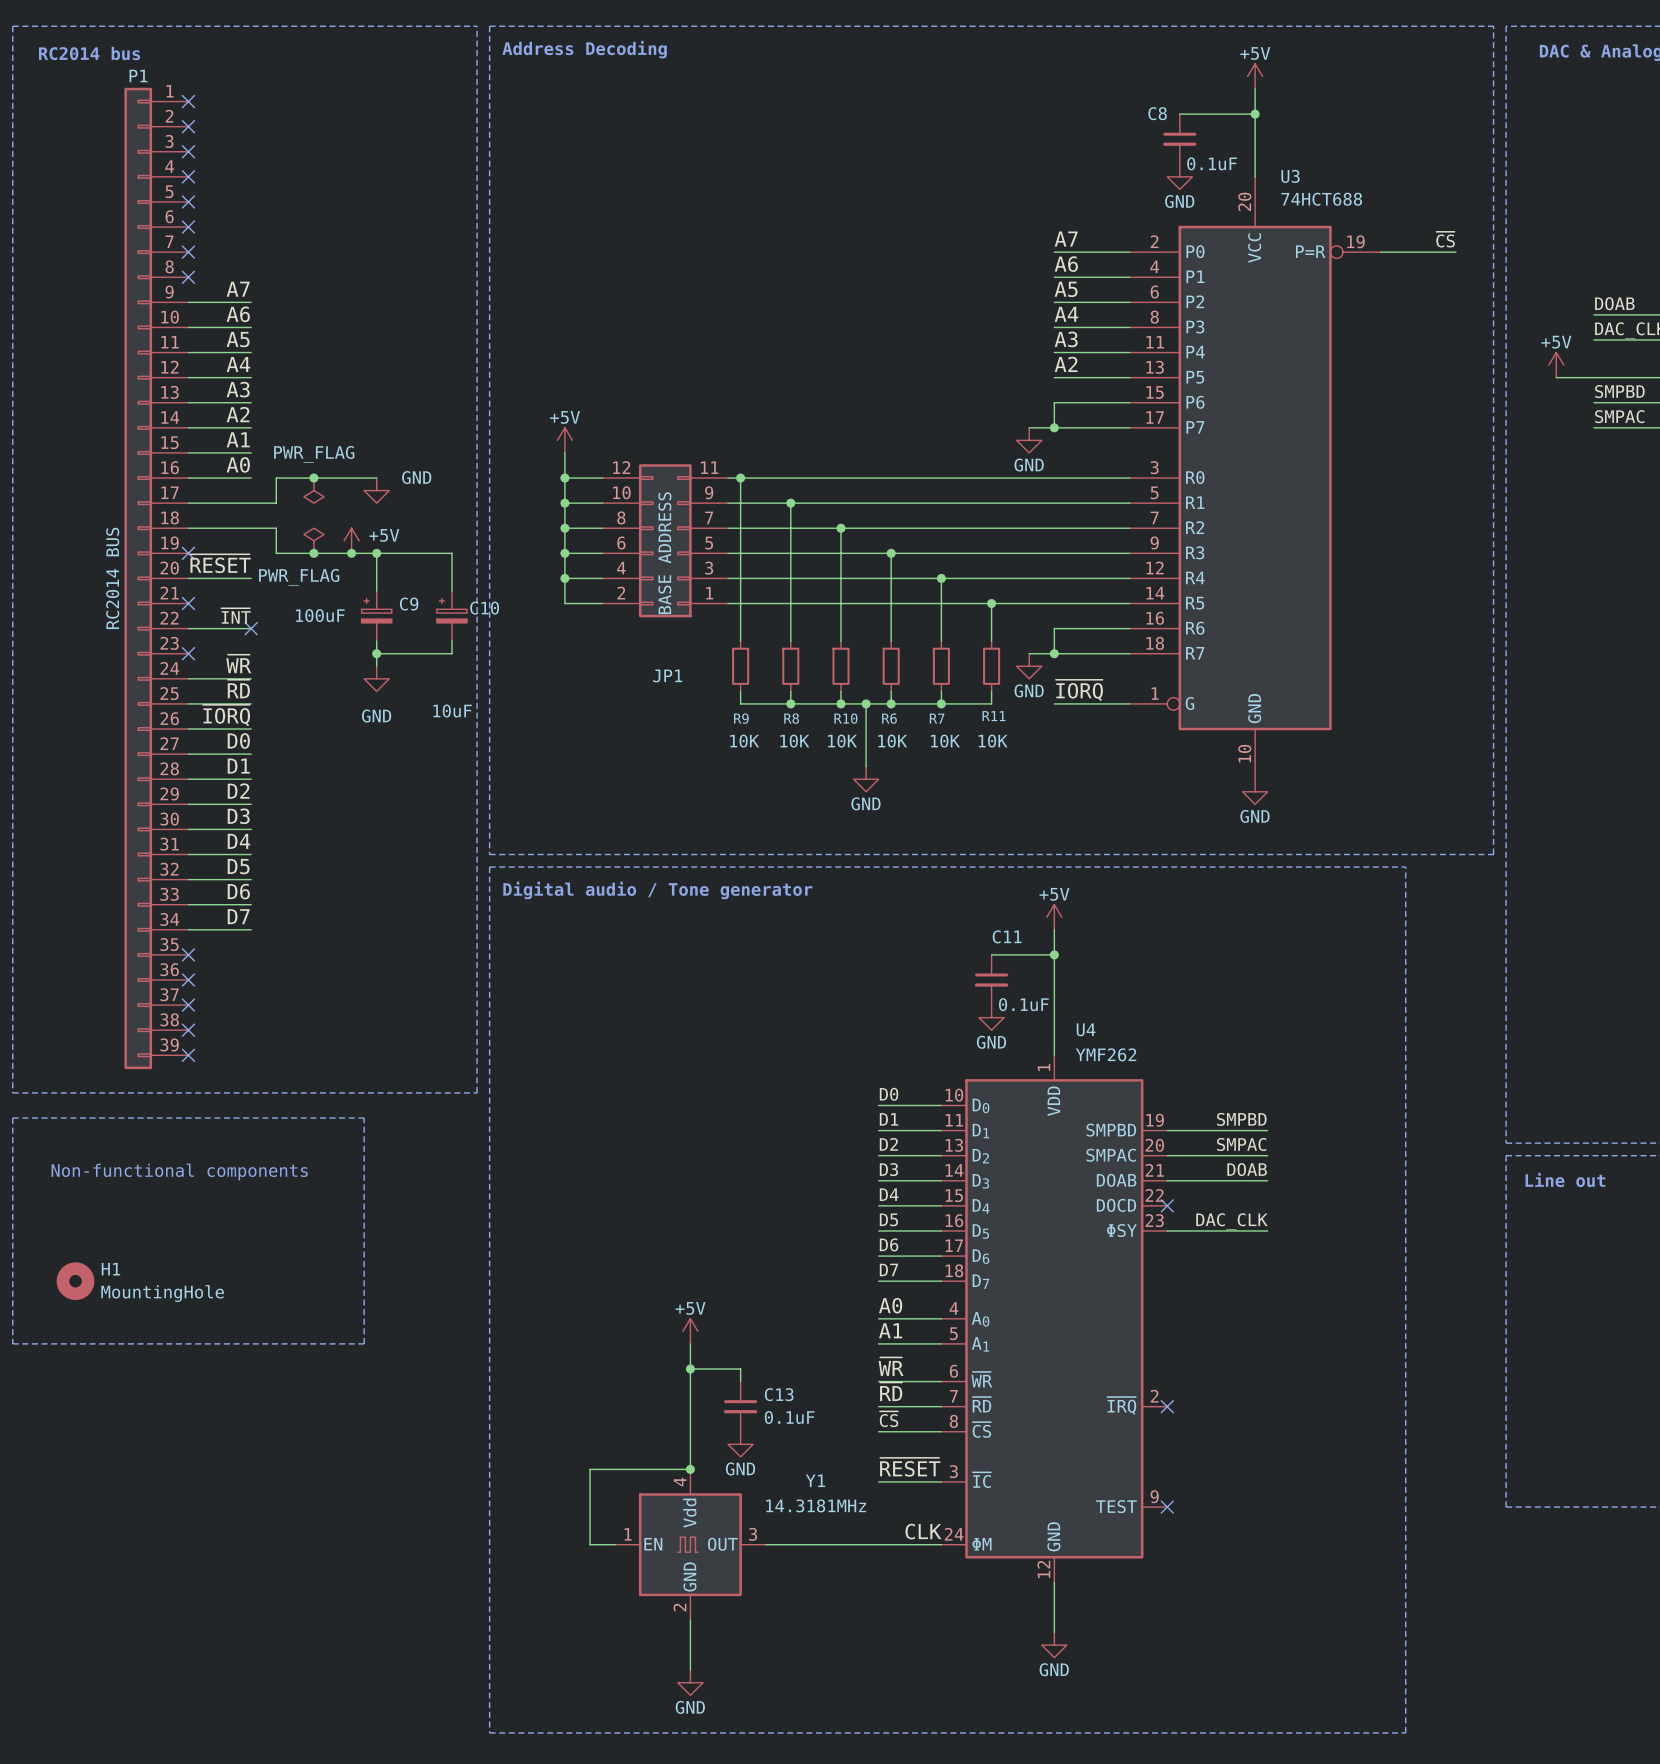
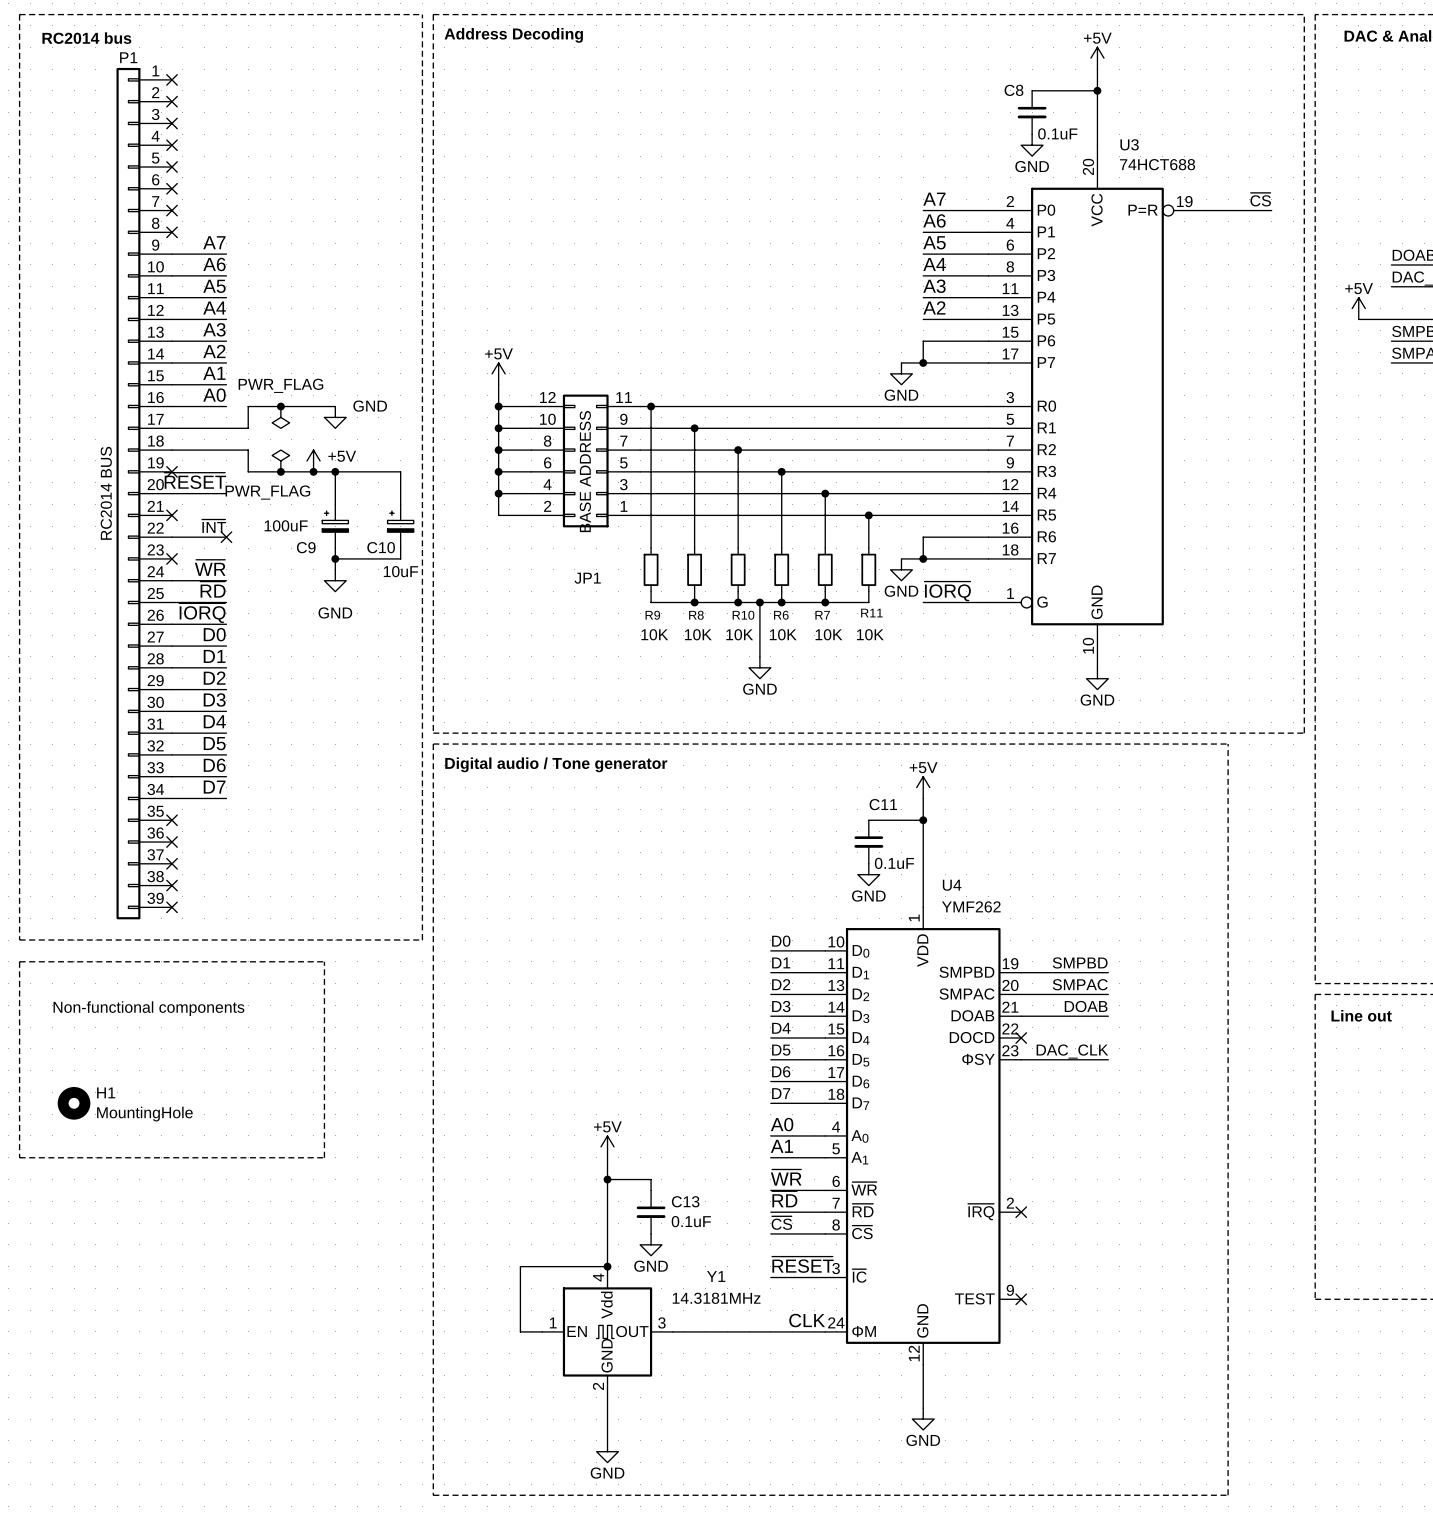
C9 name position: C9 (409, 604) -> C9 (306, 547)
C10 name position: C10 (484, 608) -> C10 (381, 547)
C10 value position: 10uF (452, 710) -> 10uF (400, 571)

